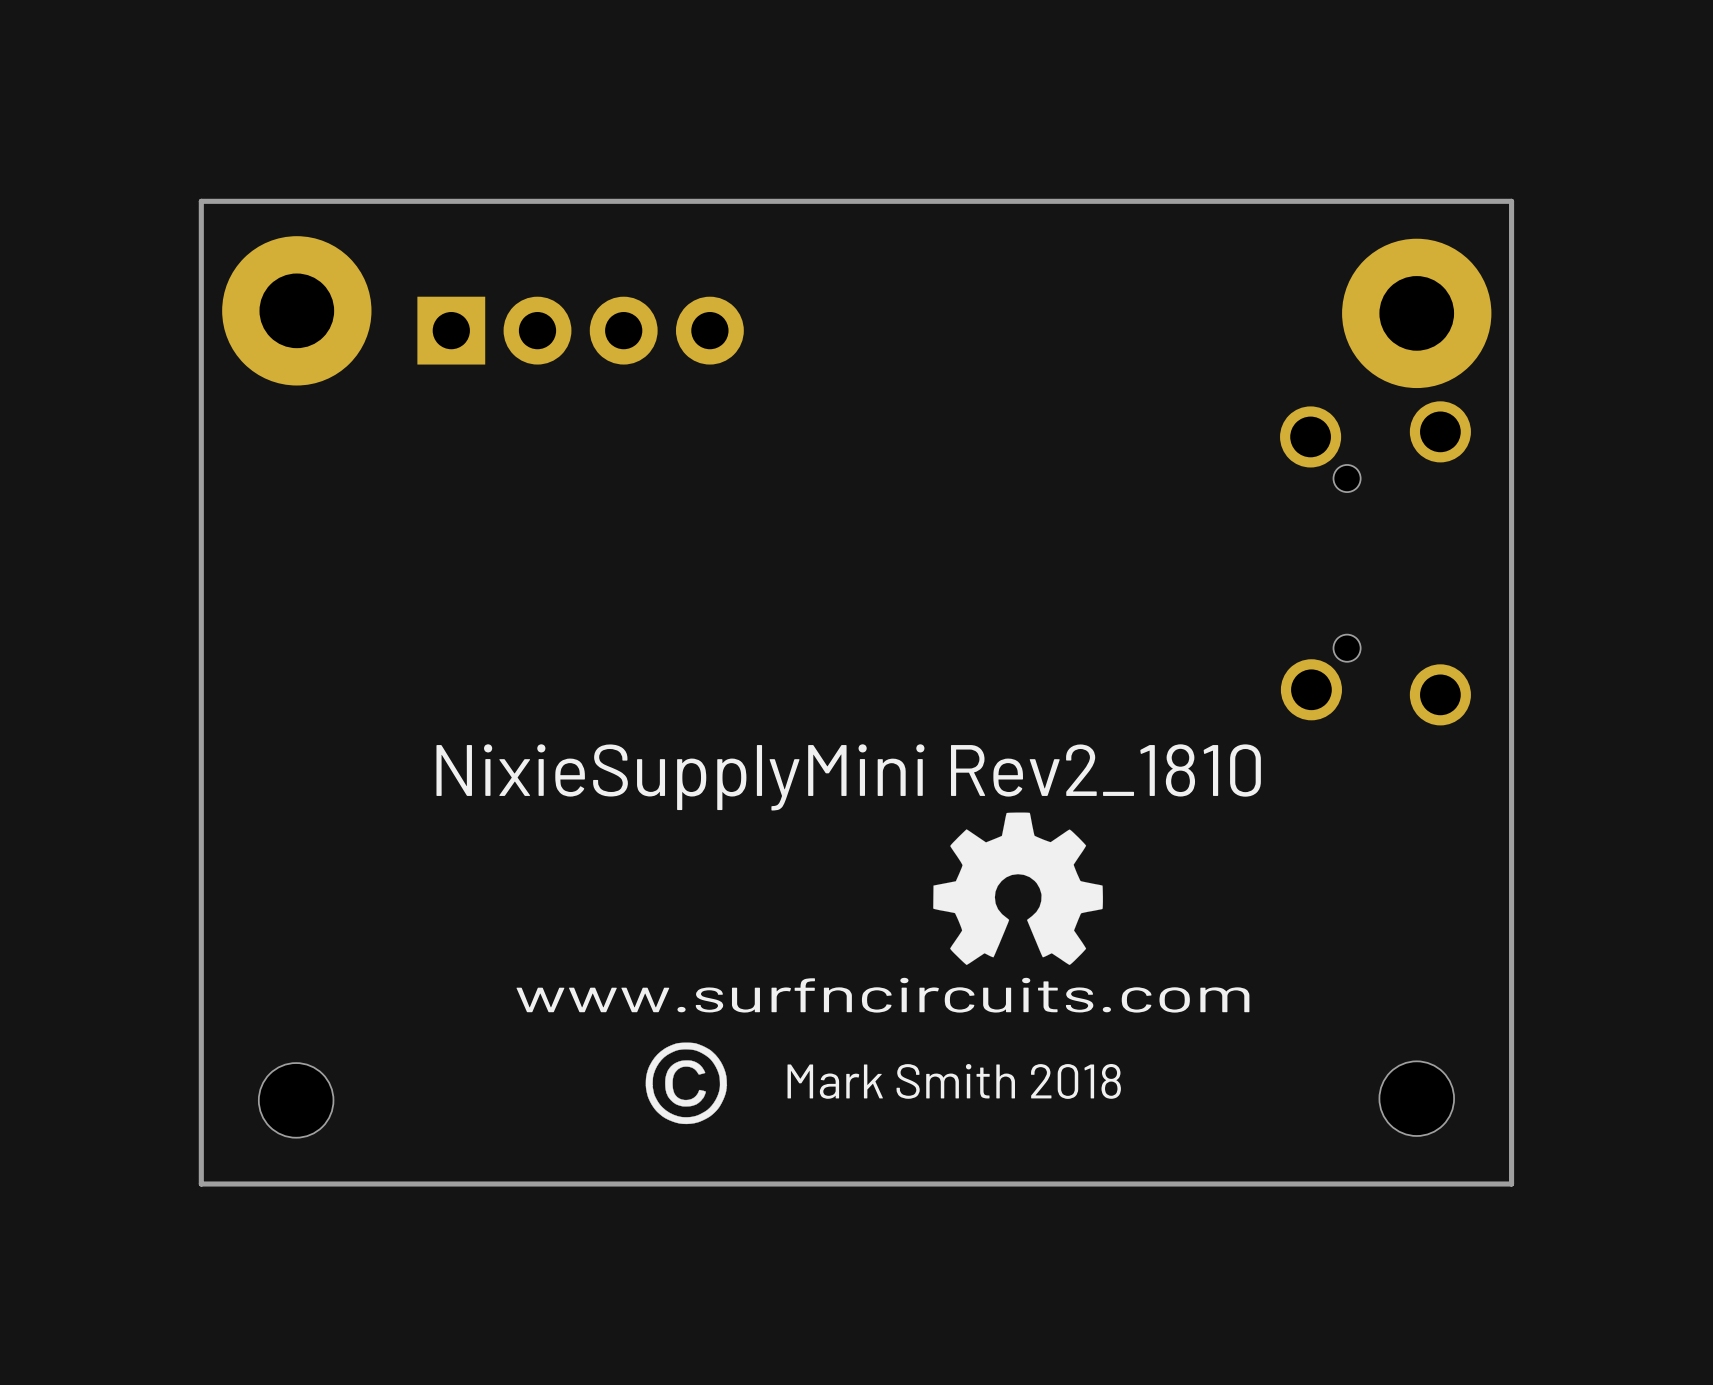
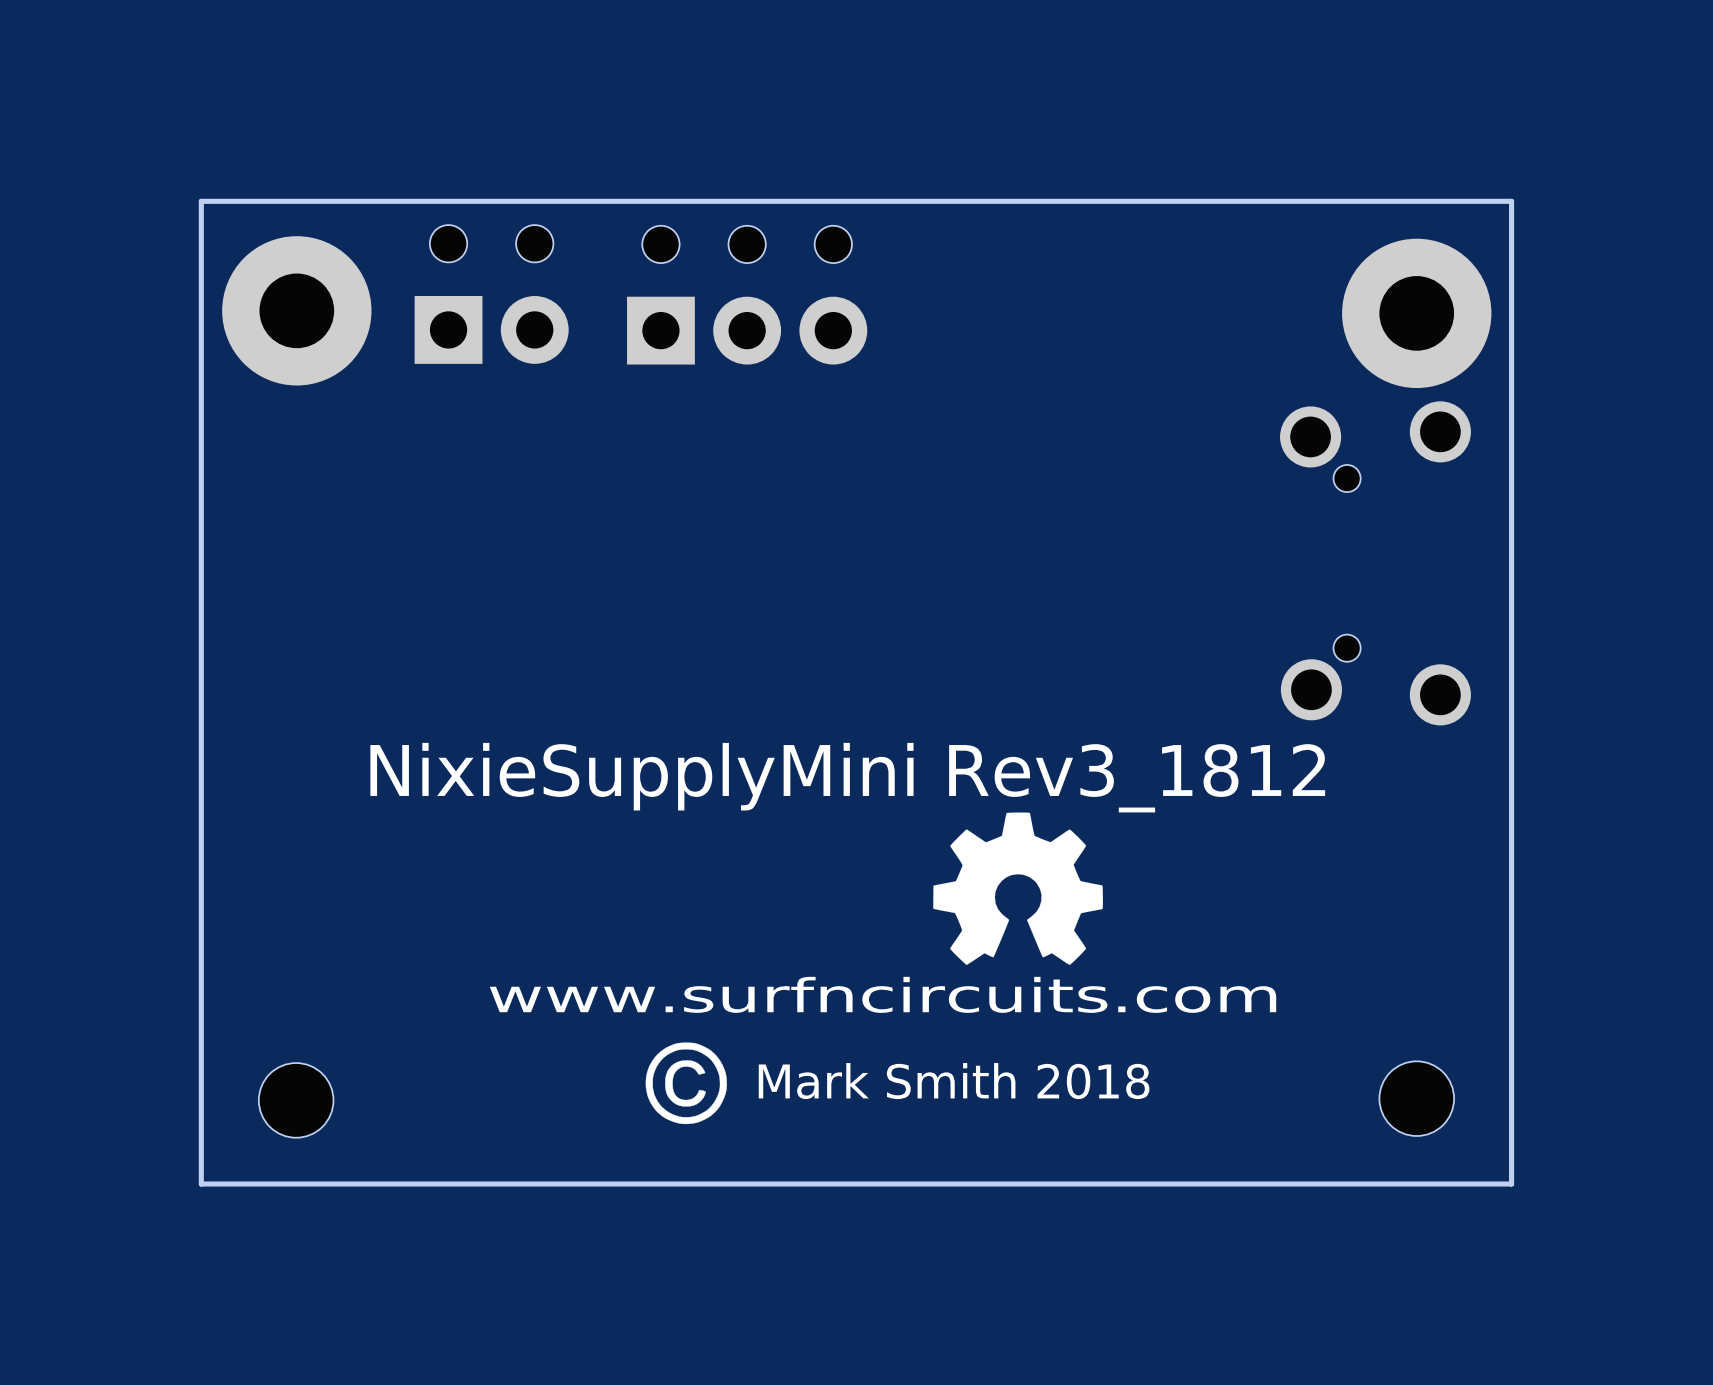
part: none -> (491, 294)
part: none -> (747, 295)
part: (580, 330) -> none
text: NixieSupplyMini Rev2_1810 (848, 777) -> NixieSupplyMini Rev3_1812 (847, 777)

